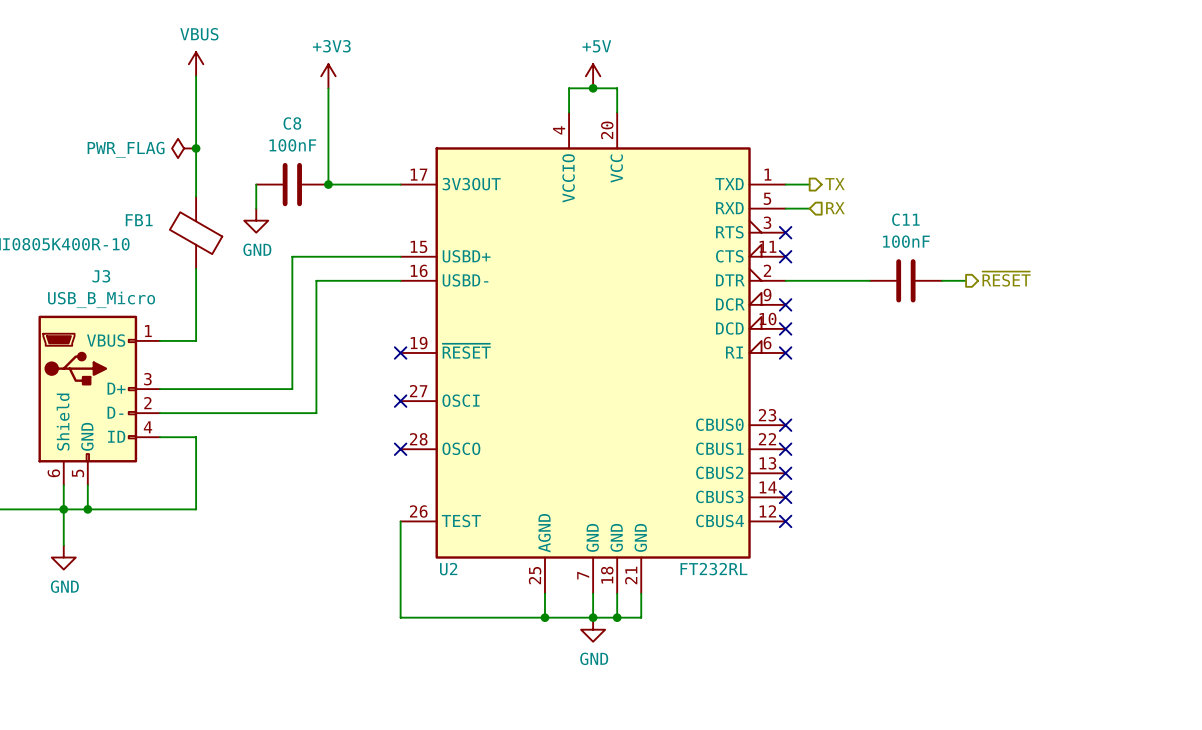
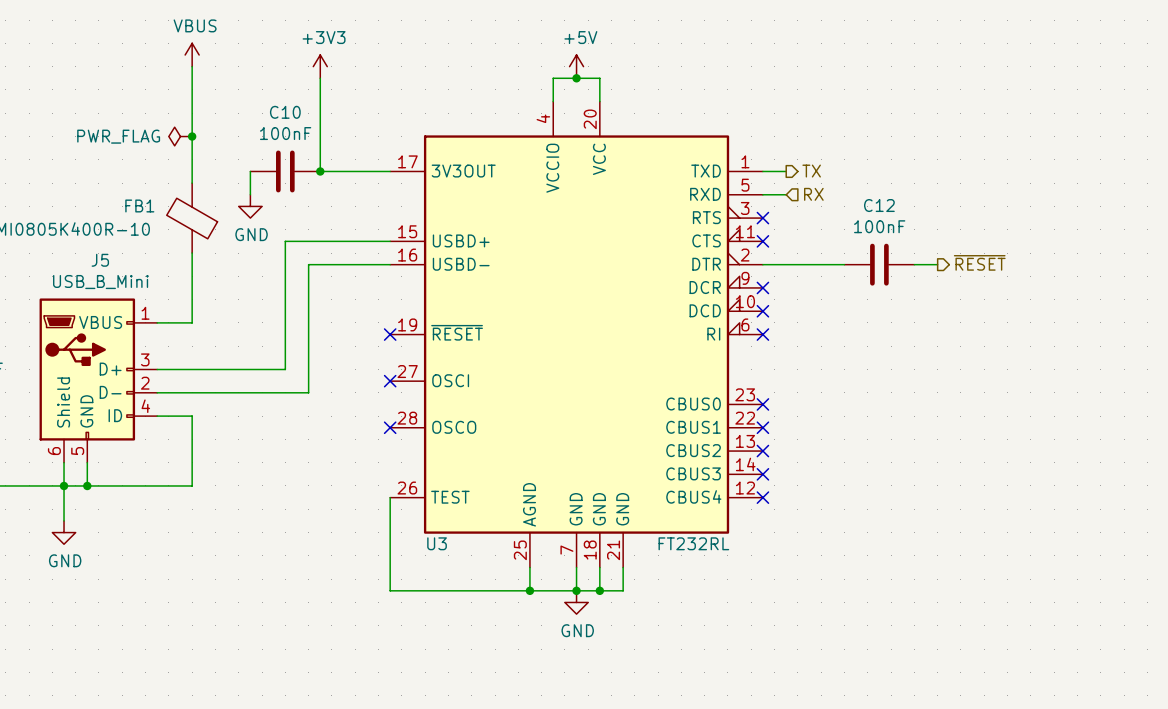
C8 name: C8 (292, 123) -> C10 (285, 112)
C11 name: C11 (905, 219) -> C12 (879, 205)
J3 name: J3 (101, 276) -> J5 (100, 260)
J3 value: USB_B_Micro (101, 299) -> USB_B_Mini (100, 282)
U2 name: U2 (448, 569) -> U3 (437, 543)

